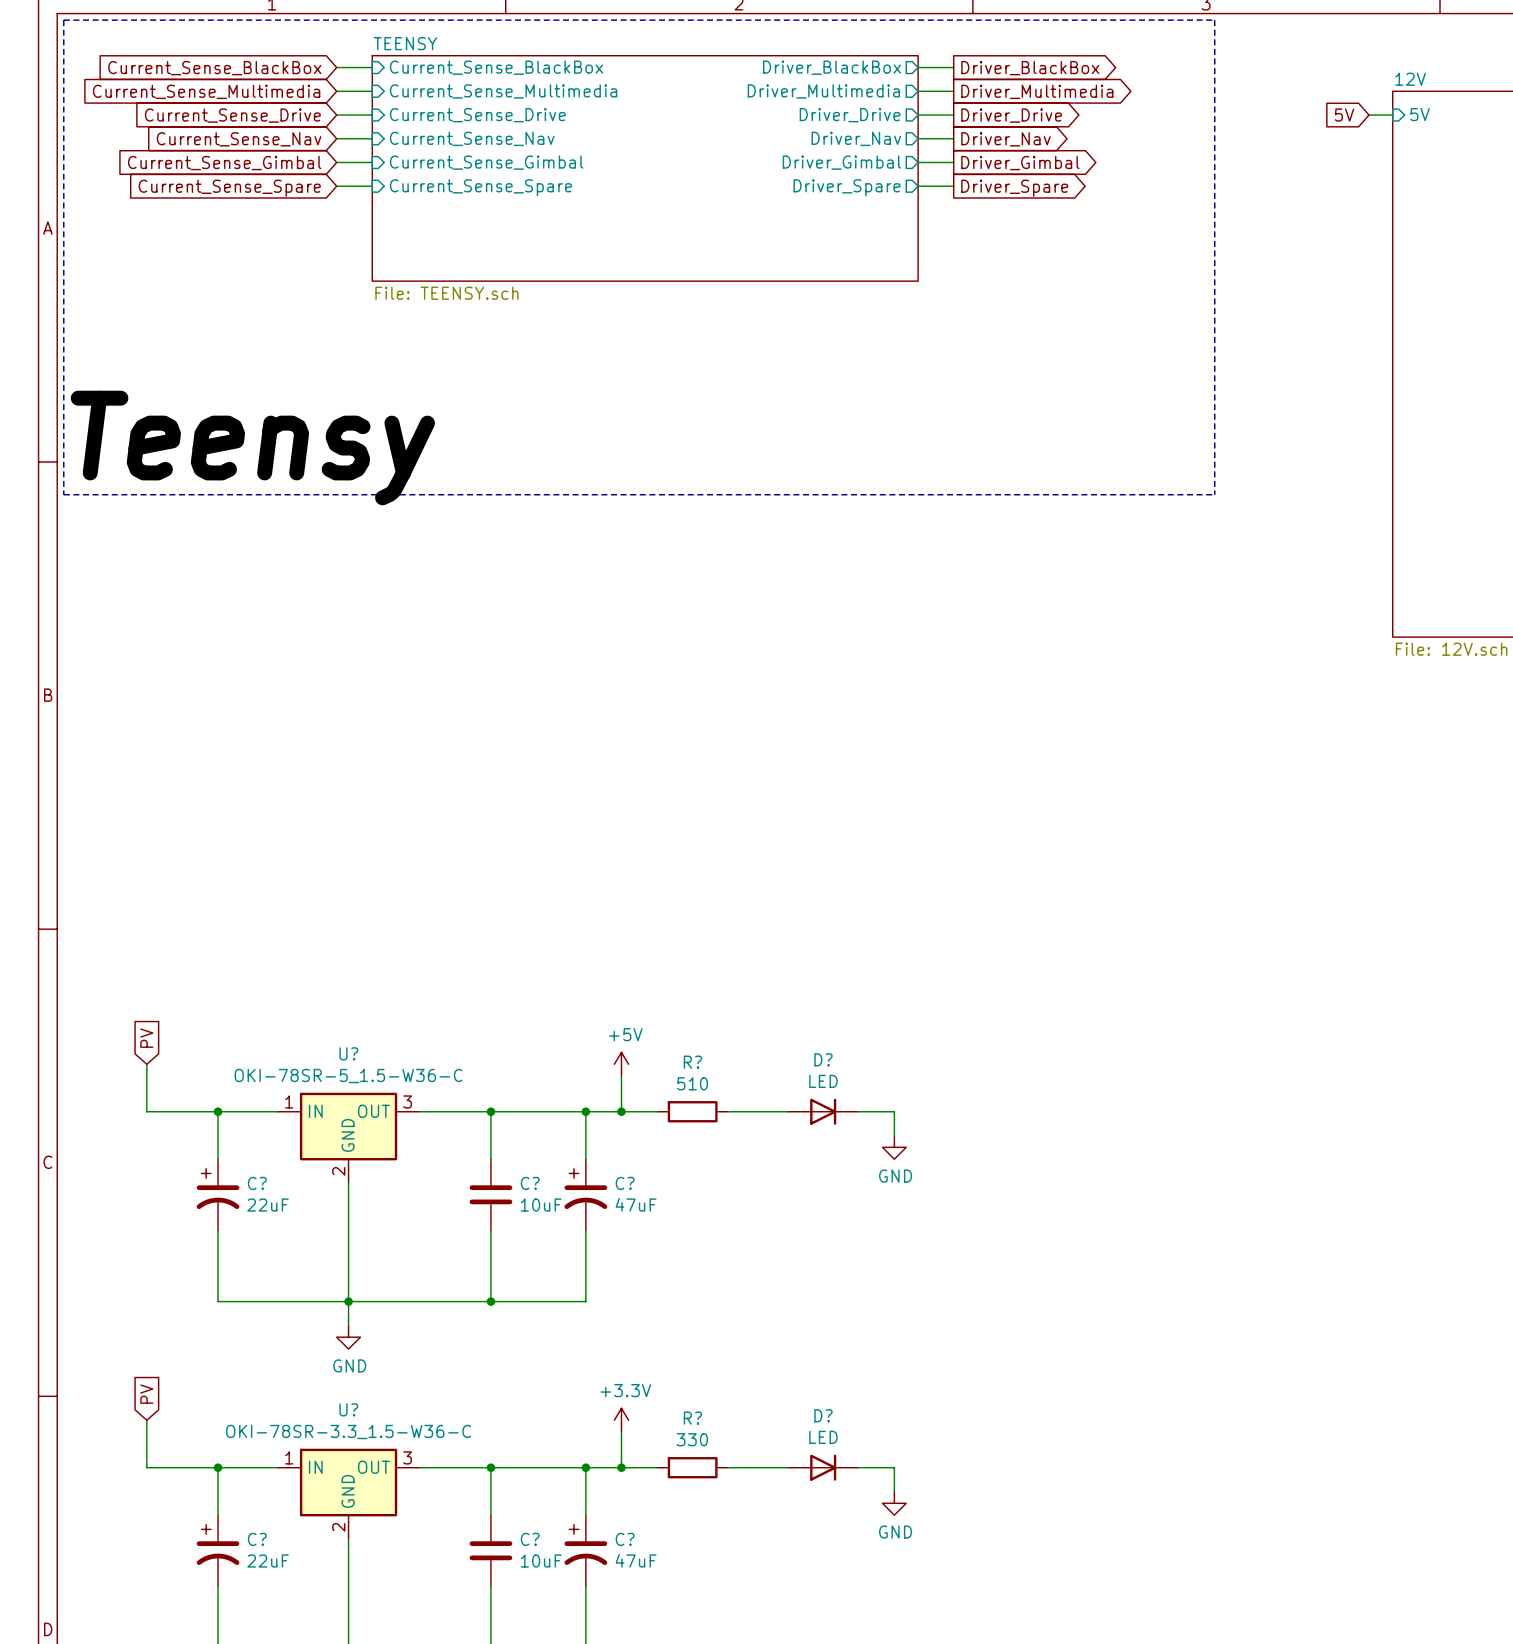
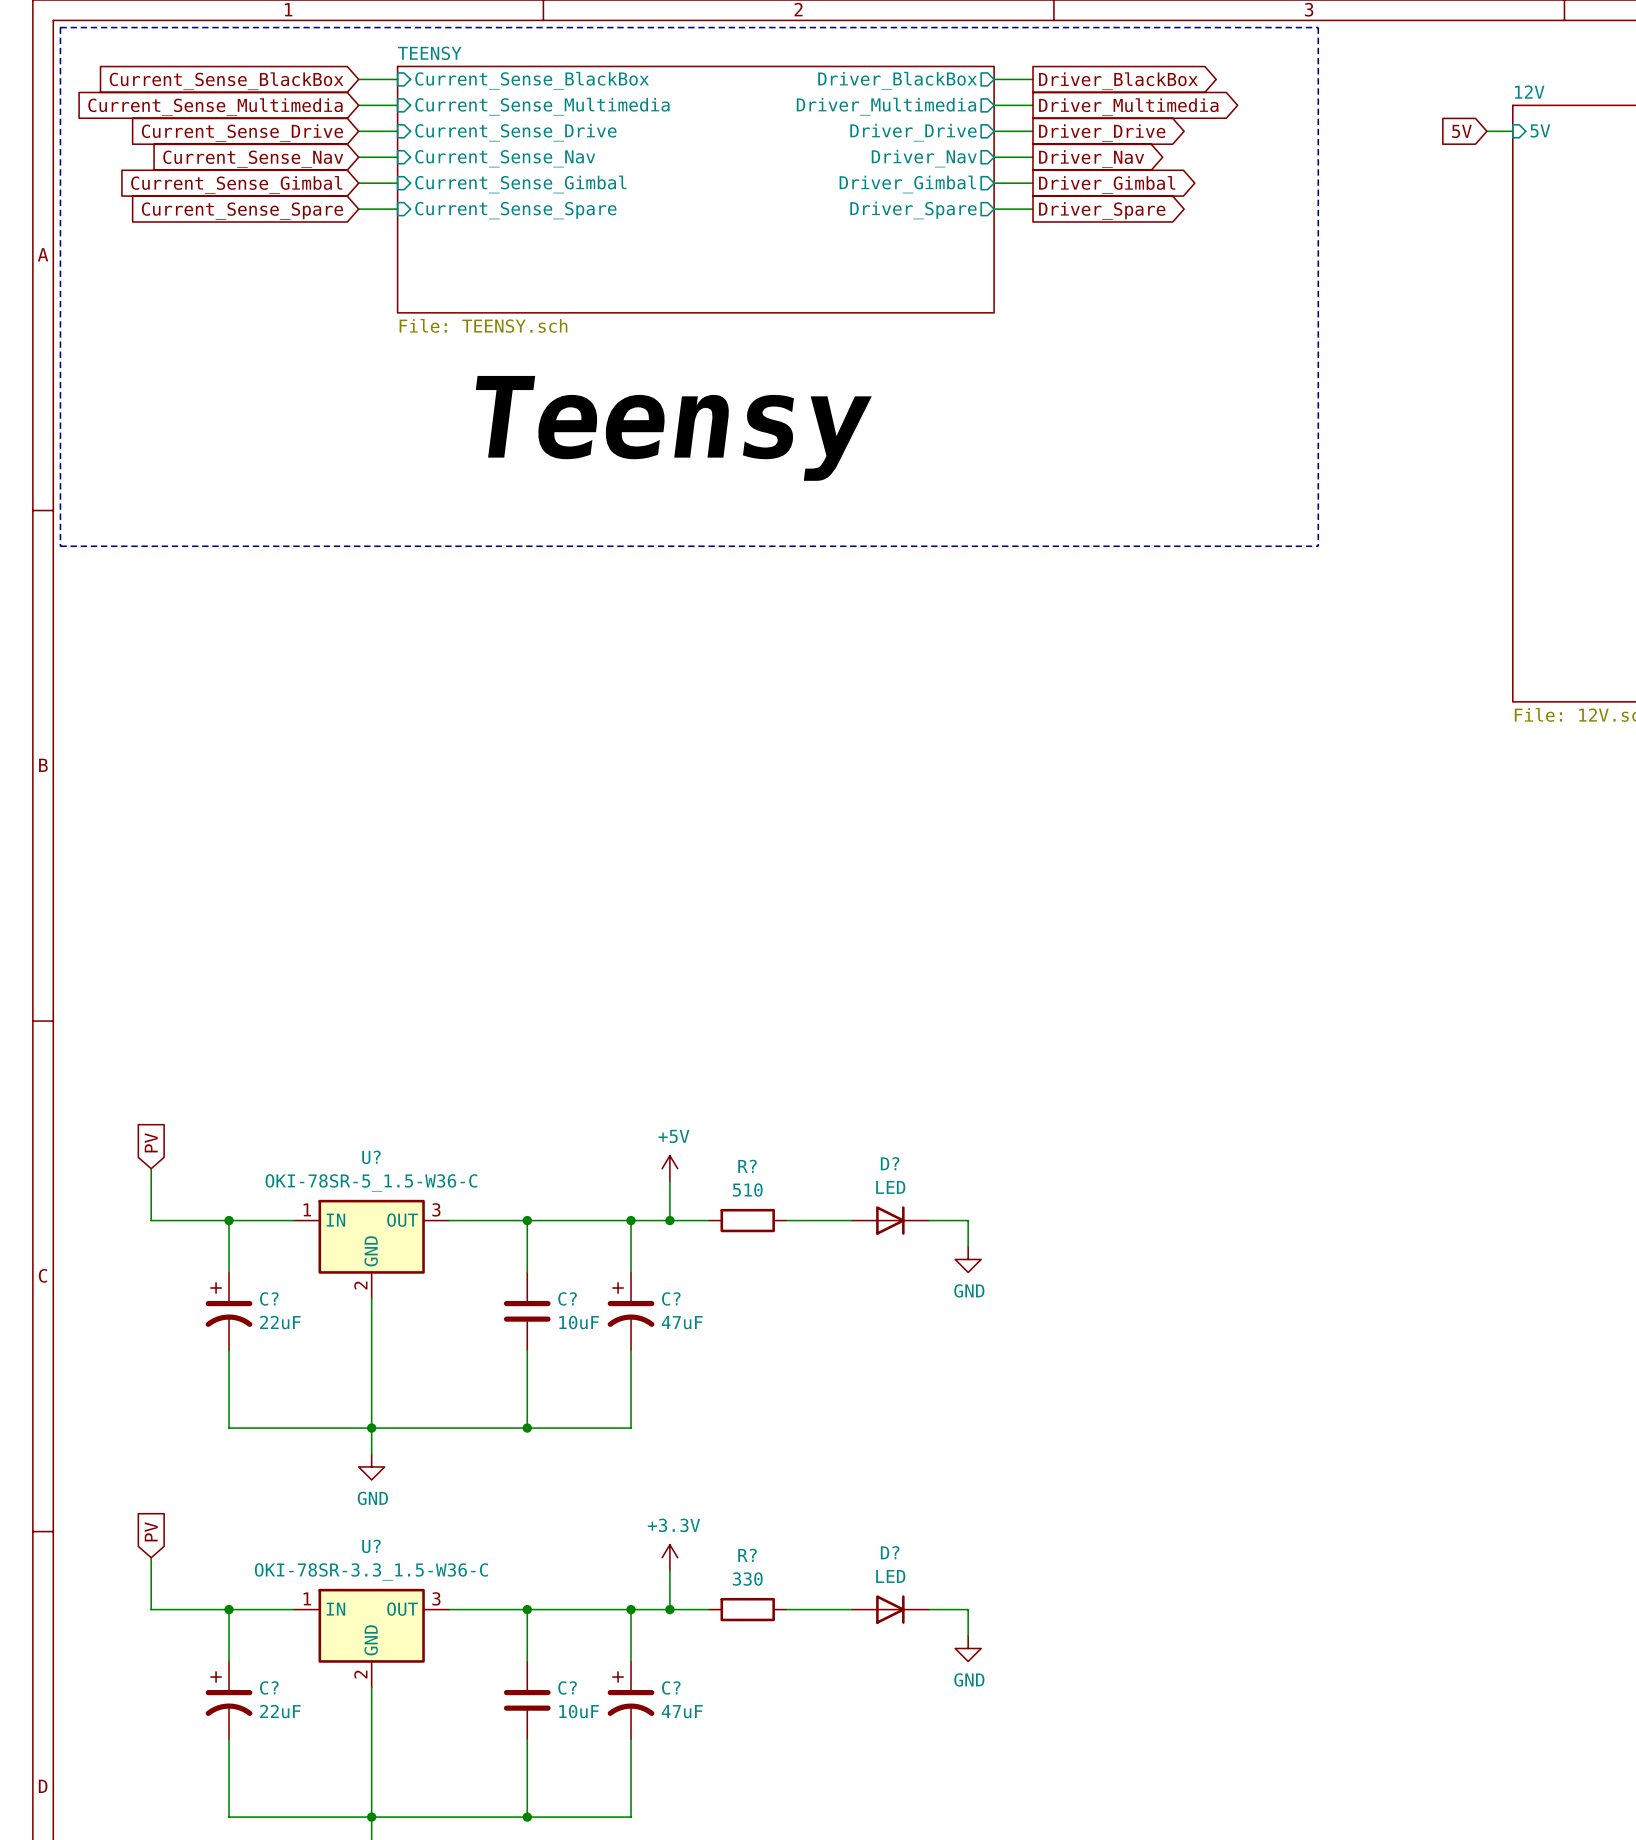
label: none -> Teensy (673, 428)
label: Teensy (252, 448) -> none

